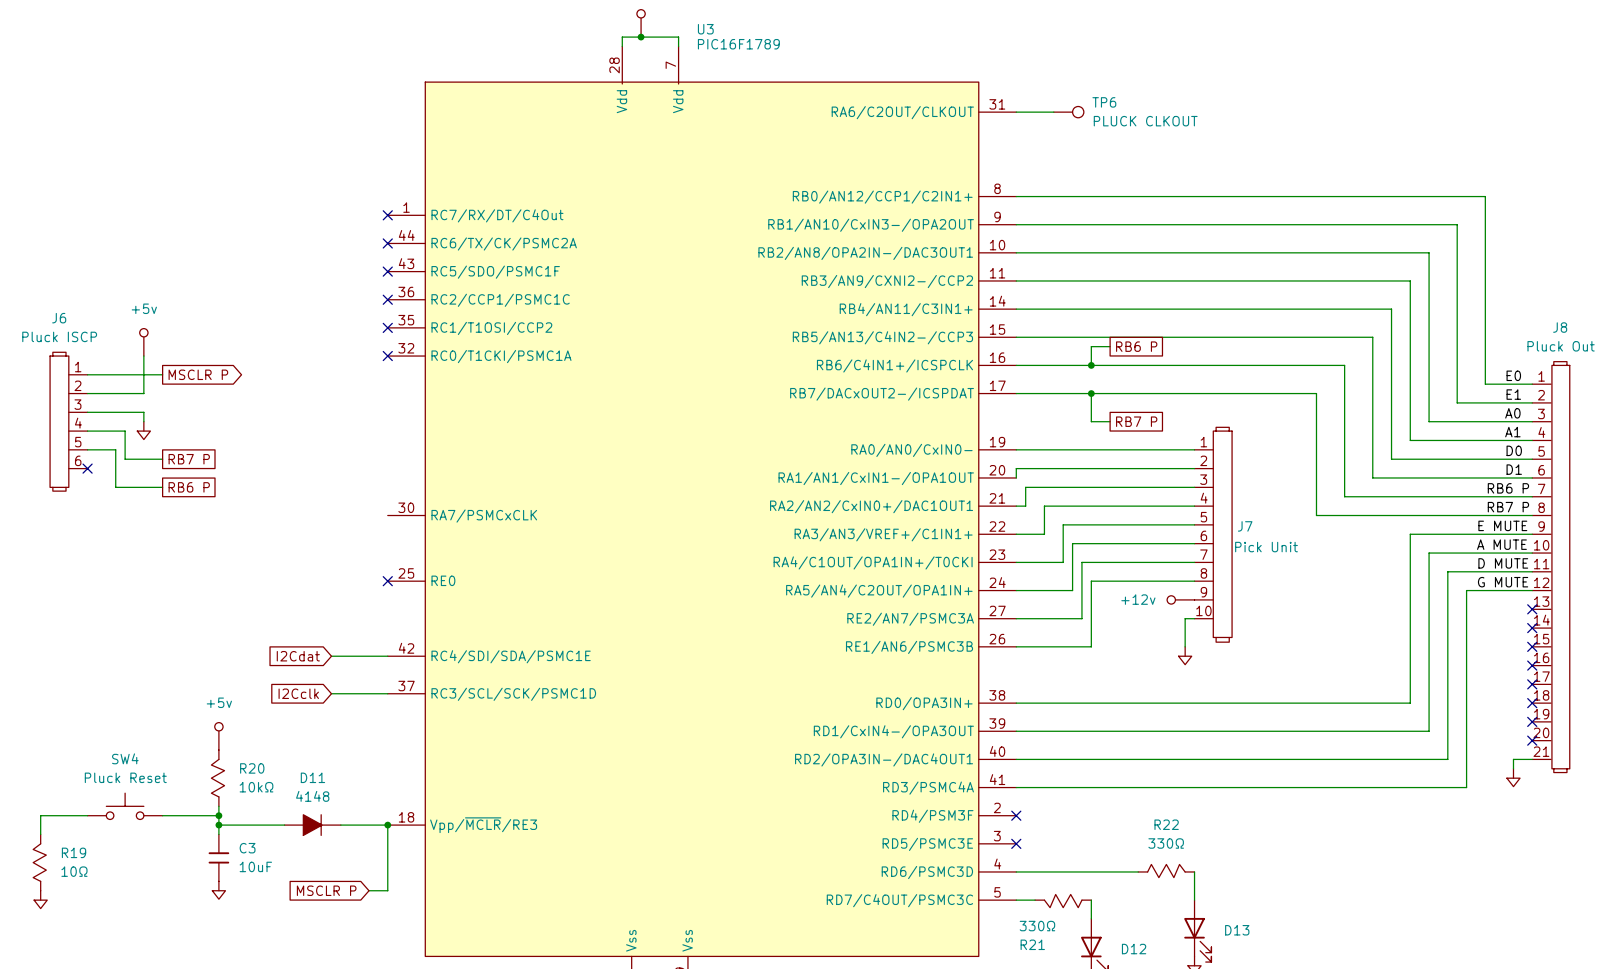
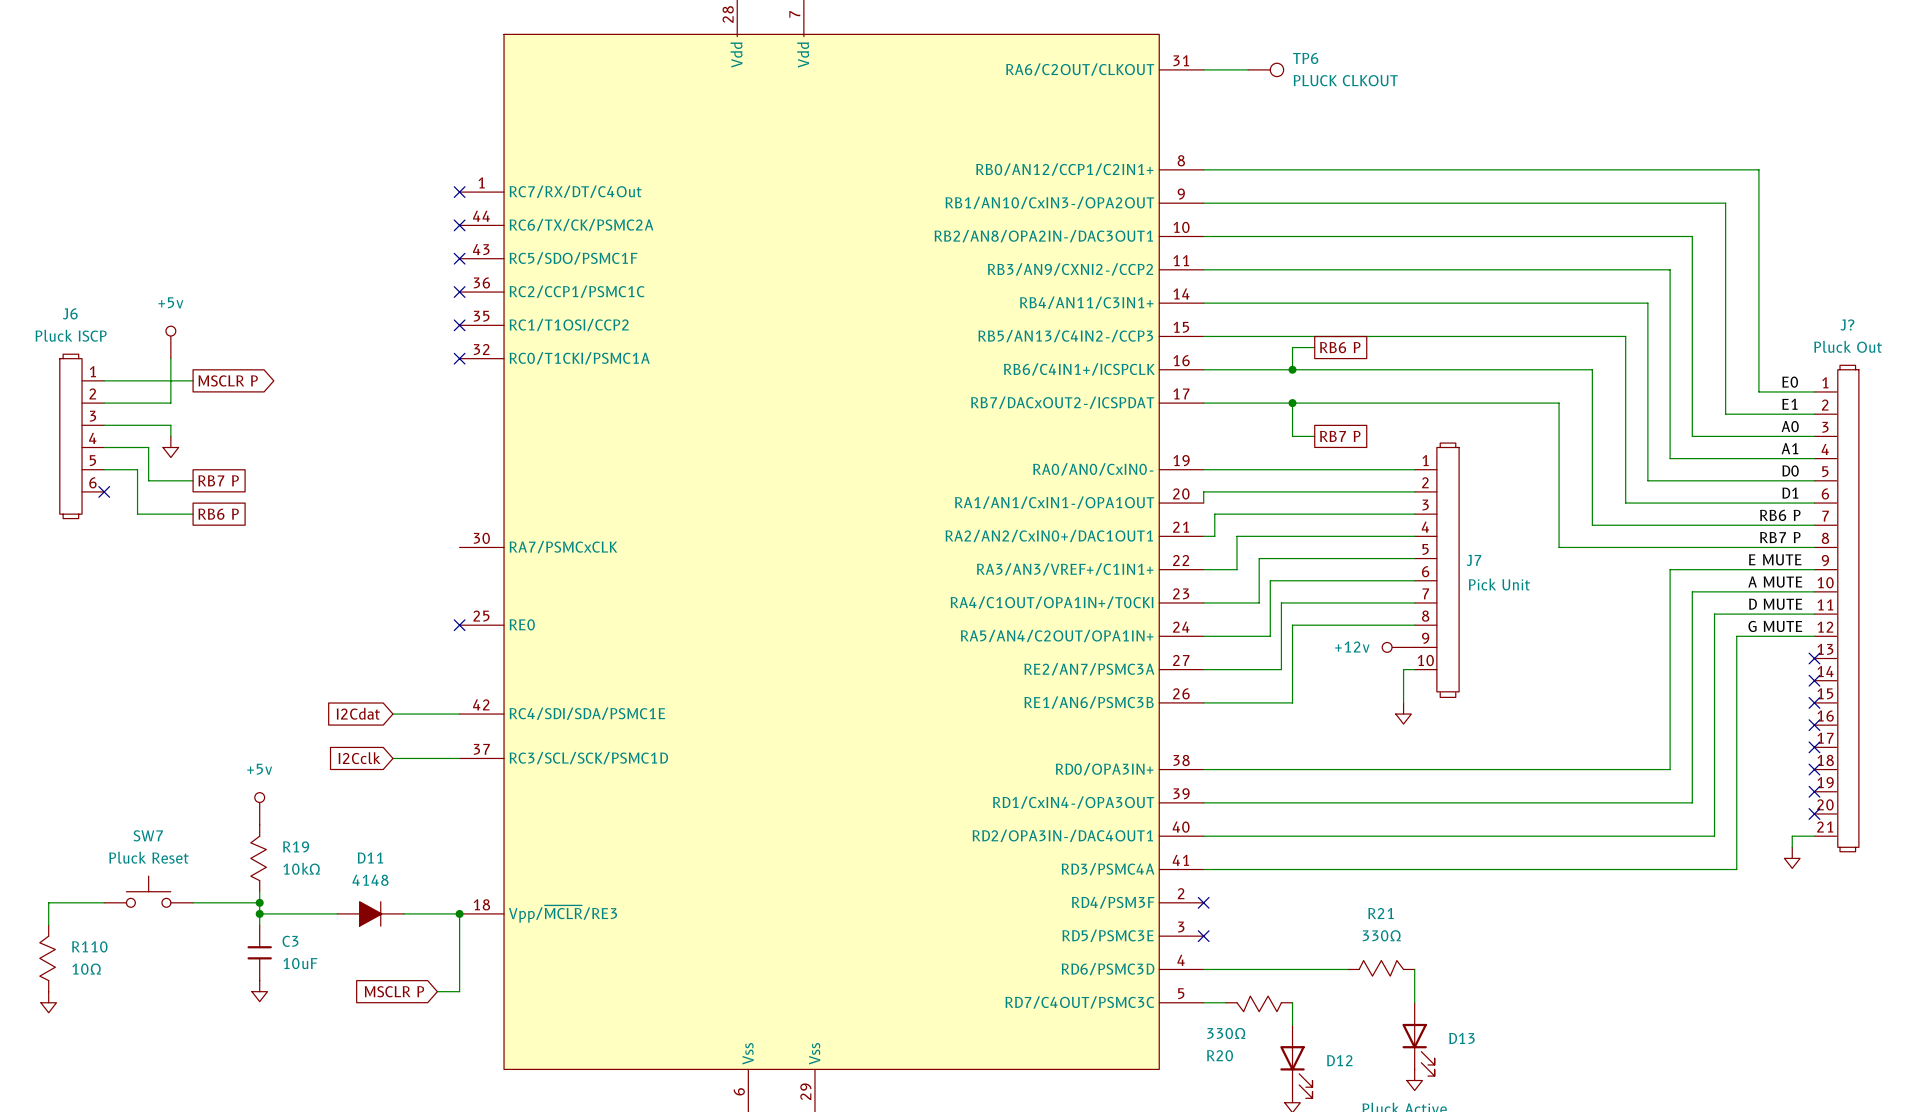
J8 name: J8 (1560, 327) -> J? (1847, 324)
SW4 name: SW4 (125, 758) -> SW7 (148, 835)
R20 name: R20 (252, 768) -> R19 (296, 846)
R22 name: R22 (1166, 824) -> R21 (1381, 913)
R19 name: R19 (74, 852) -> R110 (89, 946)
R21 name: R21 (1032, 944) -> R20 (1220, 1055)

